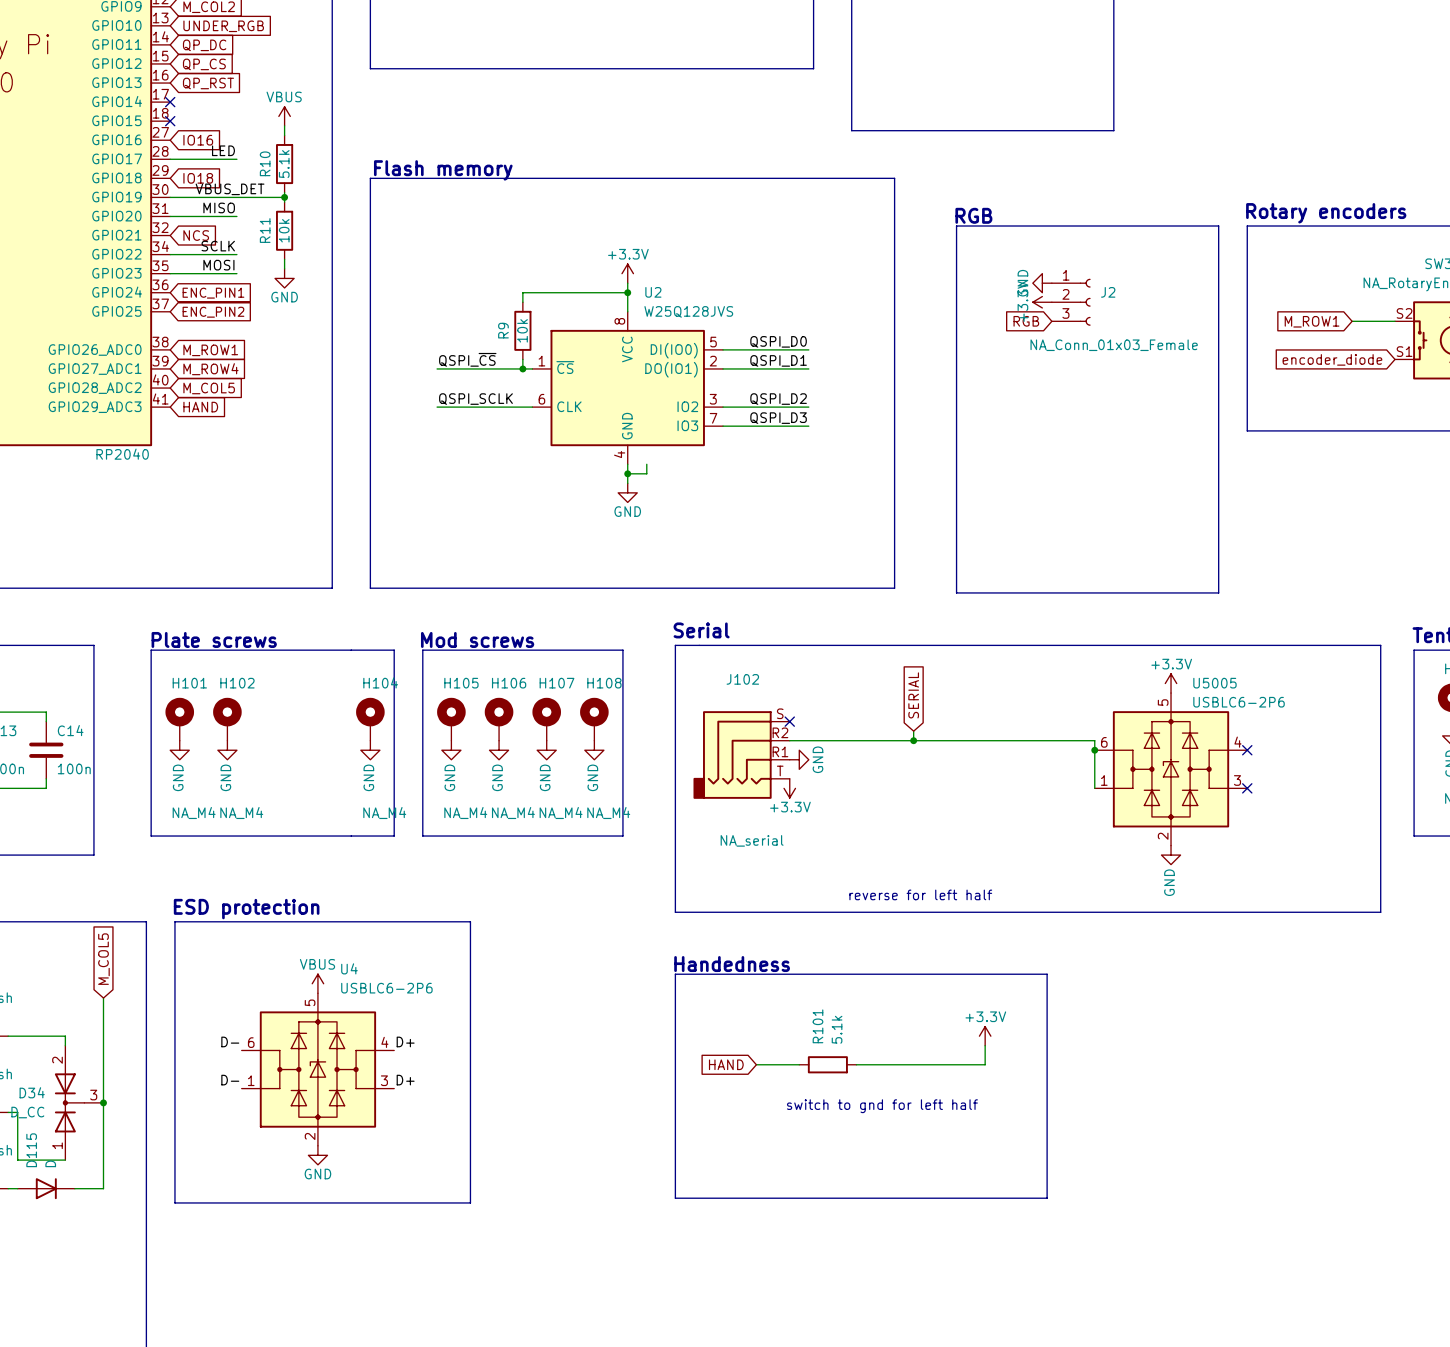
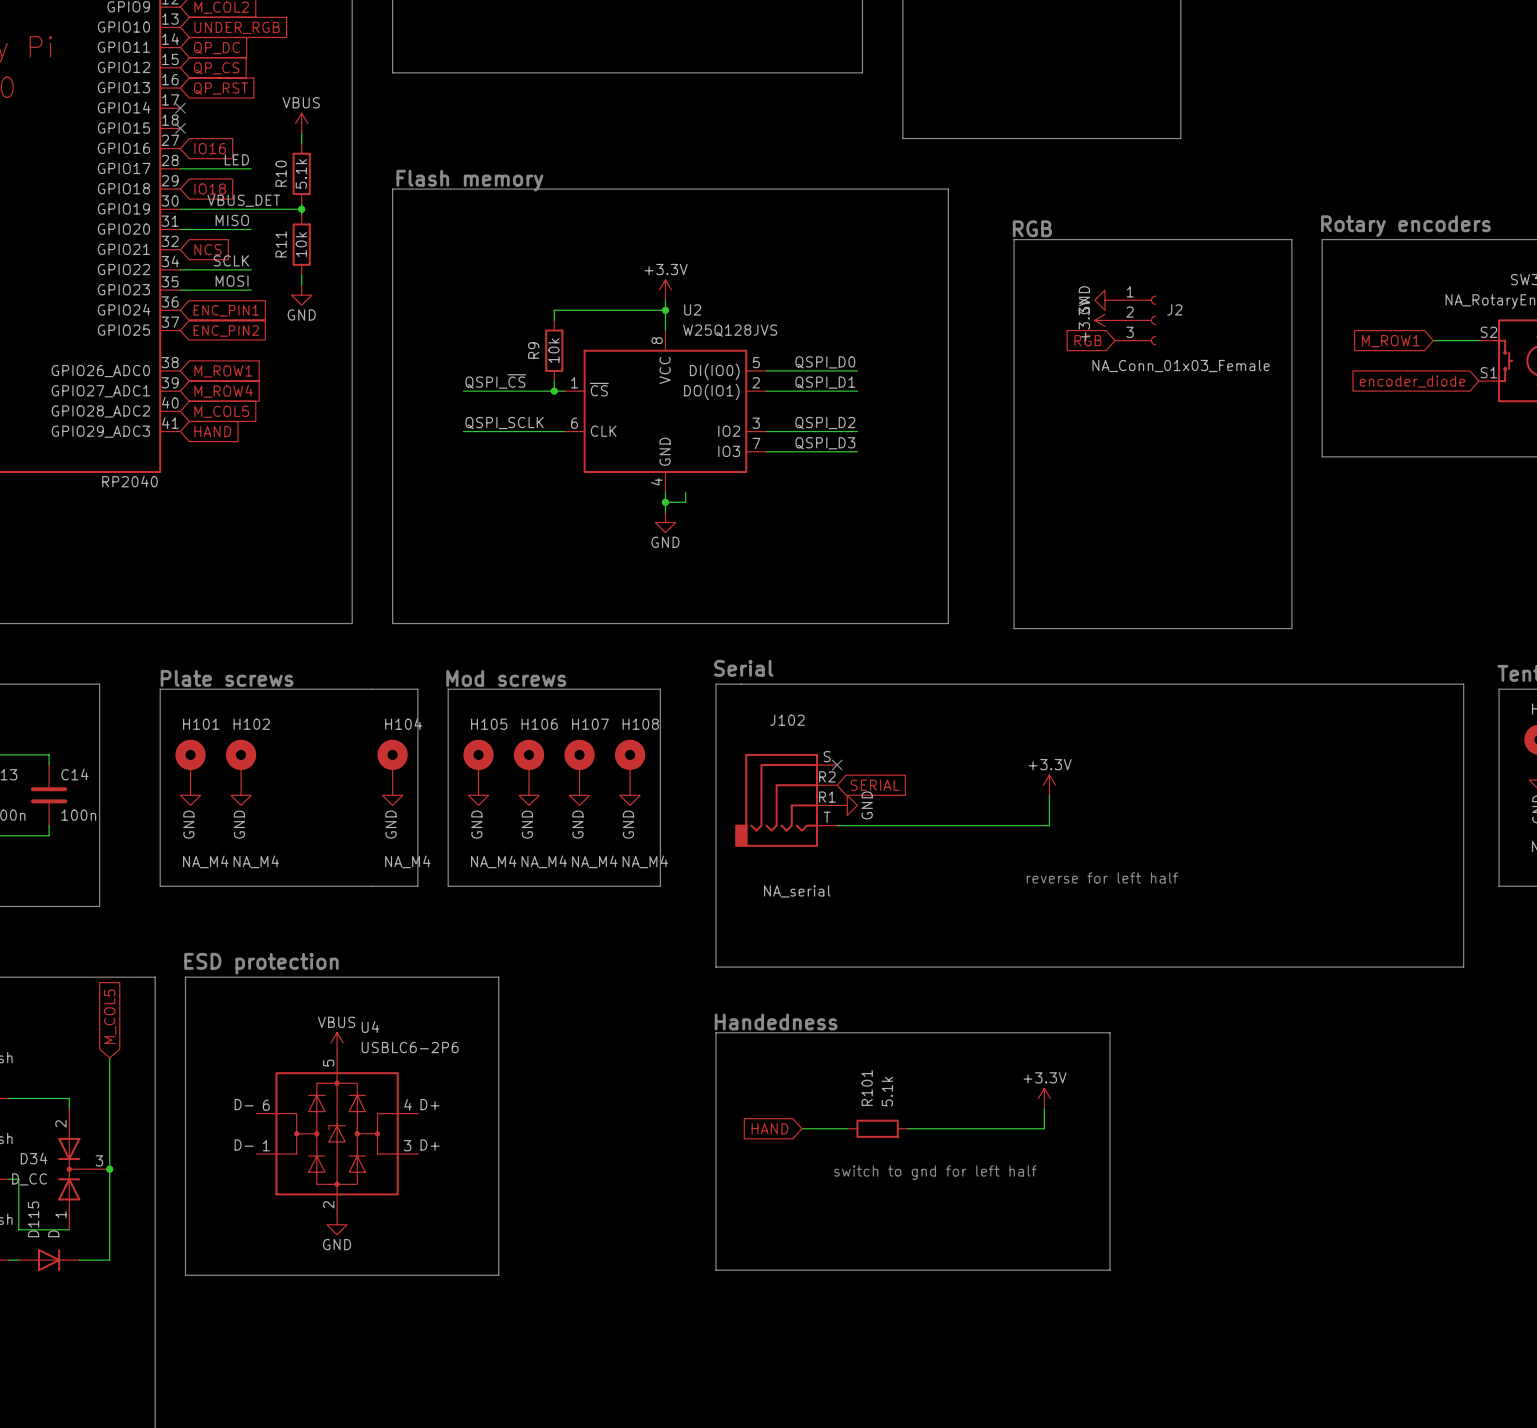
power symbol: +3.3V (1171, 683) -> none
global label rotation: 0° (913, 695) -> 90° clockwise (875, 785)
global label position: SERIAL (913, 695) -> SERIAL (875, 785)
wire: (913, 731) (913, 740) -> none
wire: (789, 740) (1094, 740) (1094, 788) -> none
junction: (913, 740) -> none
power symbol: none -> +3.3V (1049, 785)
wire: none -> (1049, 795) (1049, 825) (837, 825)
junction: (1094, 750) -> none
no-connect mark: (1247, 750) -> none
U5005: USBLC6-2P6 (1171, 769) -> none
power symbol: +3.3V (789, 788) -> none
no-connect mark: (1247, 788) -> none
power symbol: GND (1171, 855) -> none
text position: reverse for left half (920, 894) -> reverse for left half (1102, 877)

